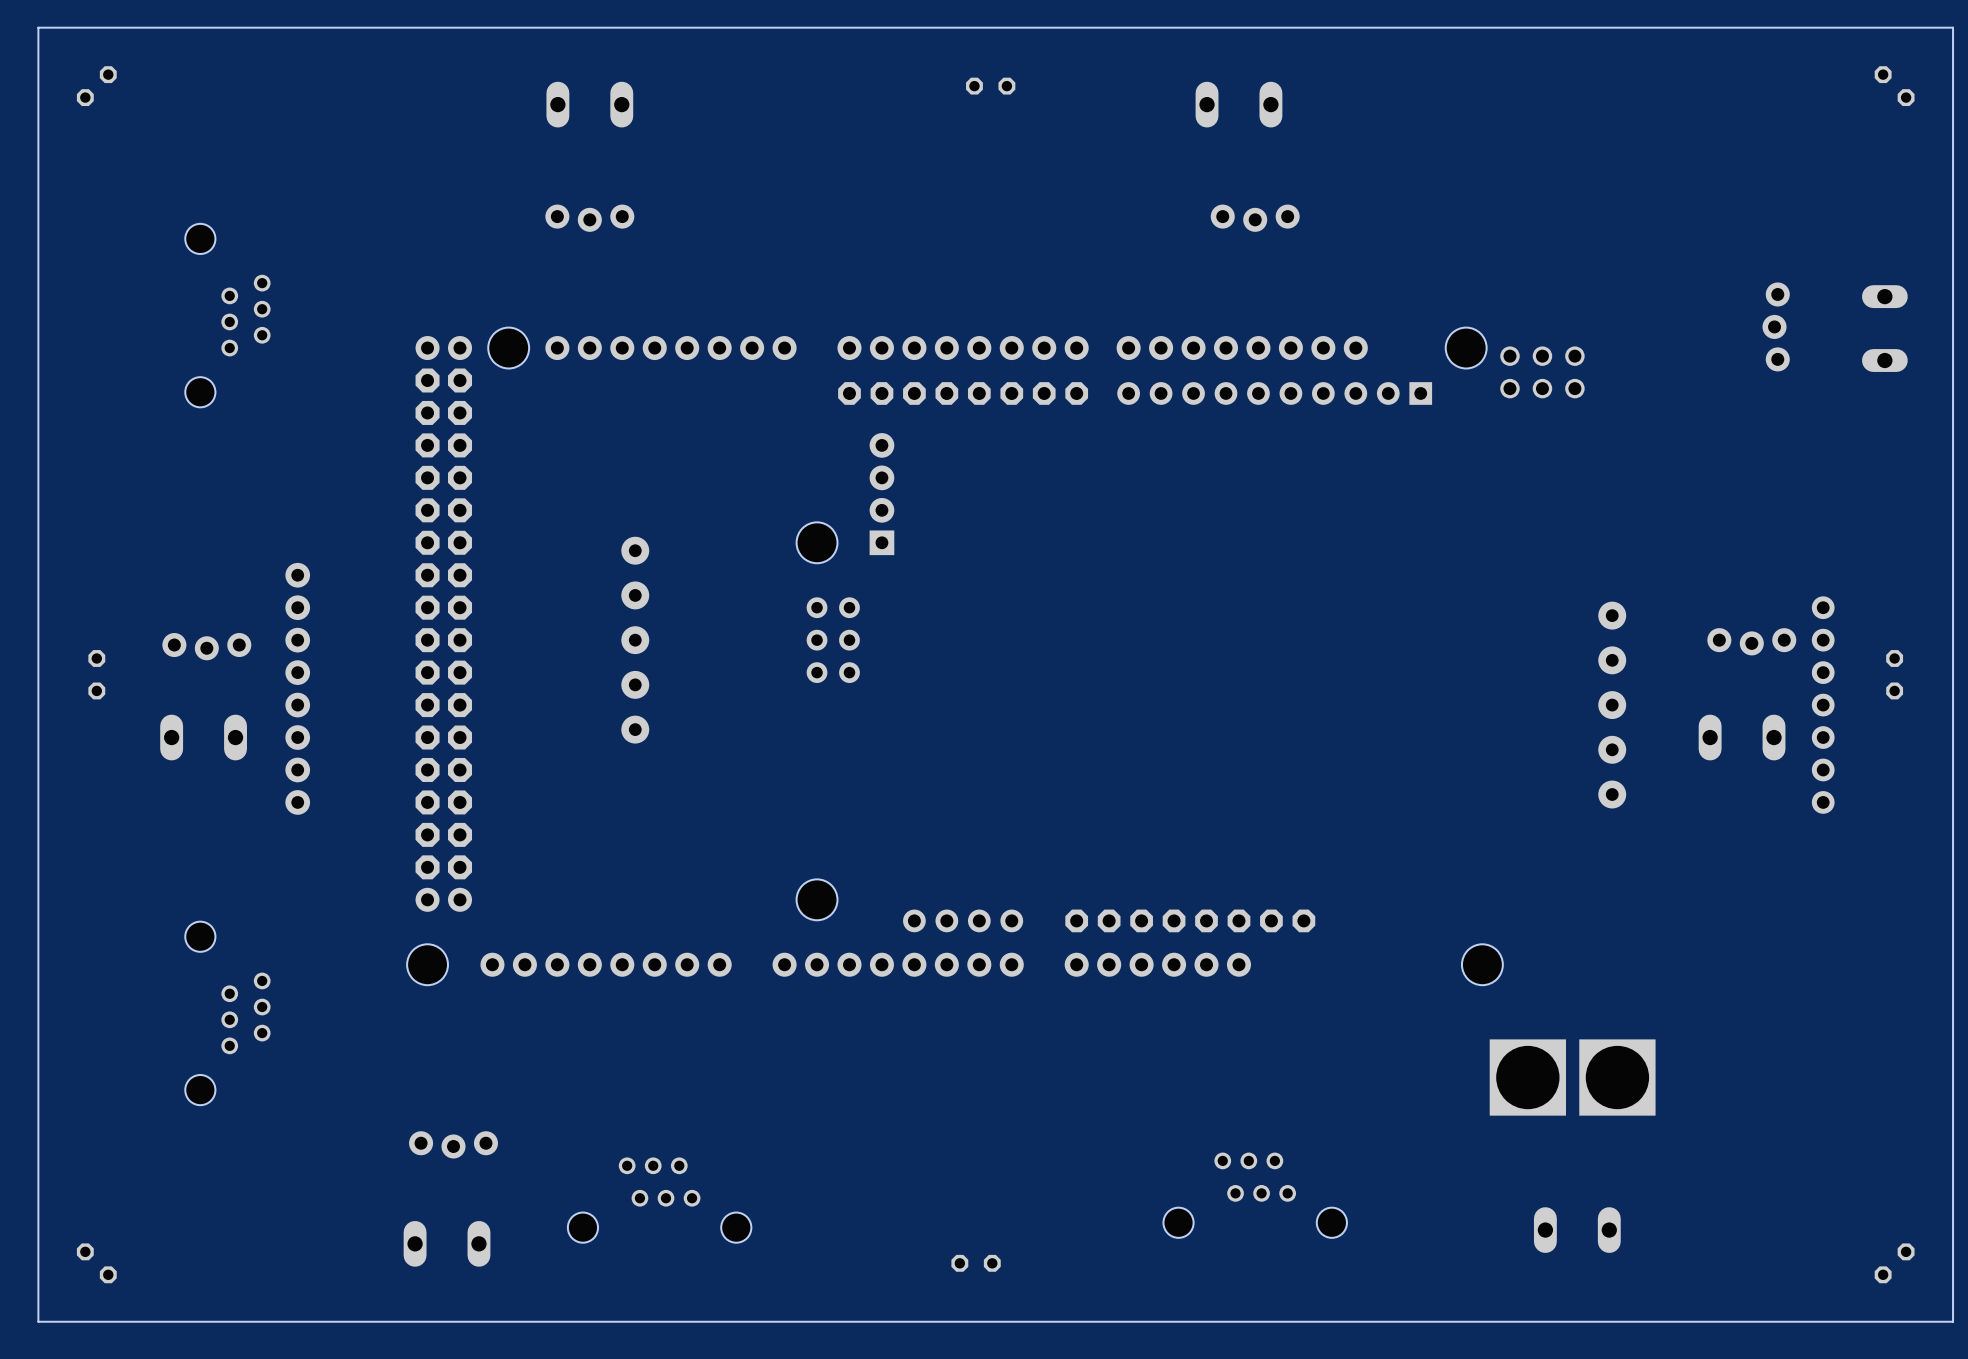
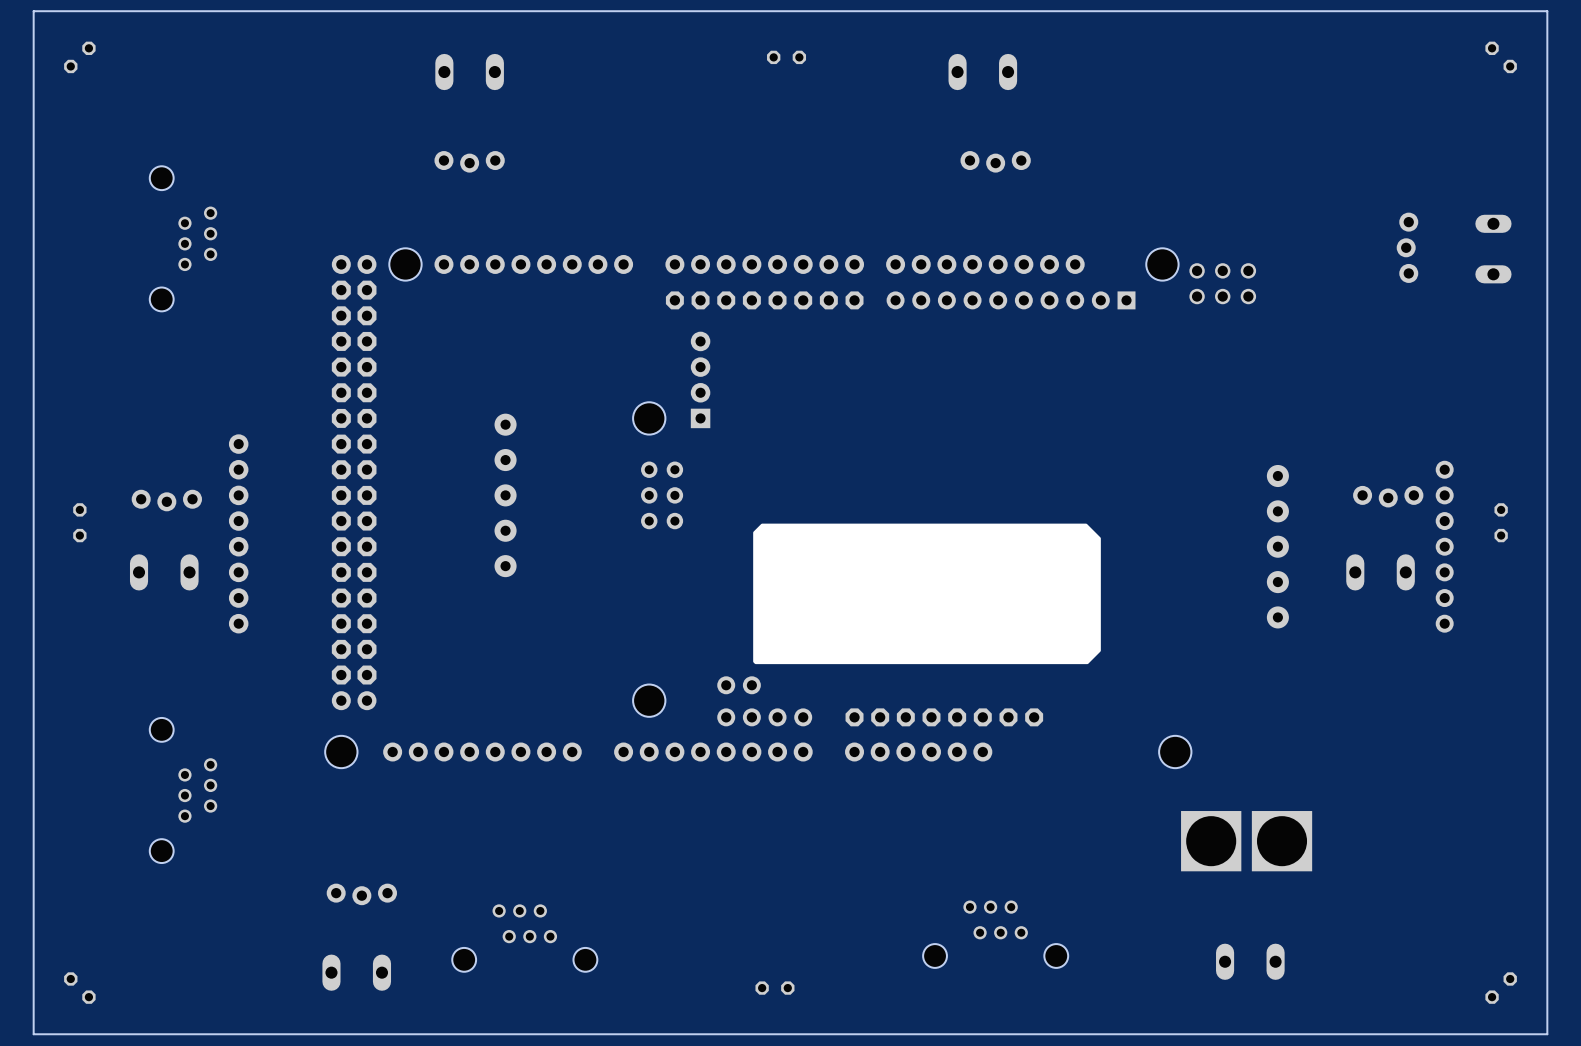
drawing: none -> [753, 523, 1101, 665]
part: none -> (739, 685)

